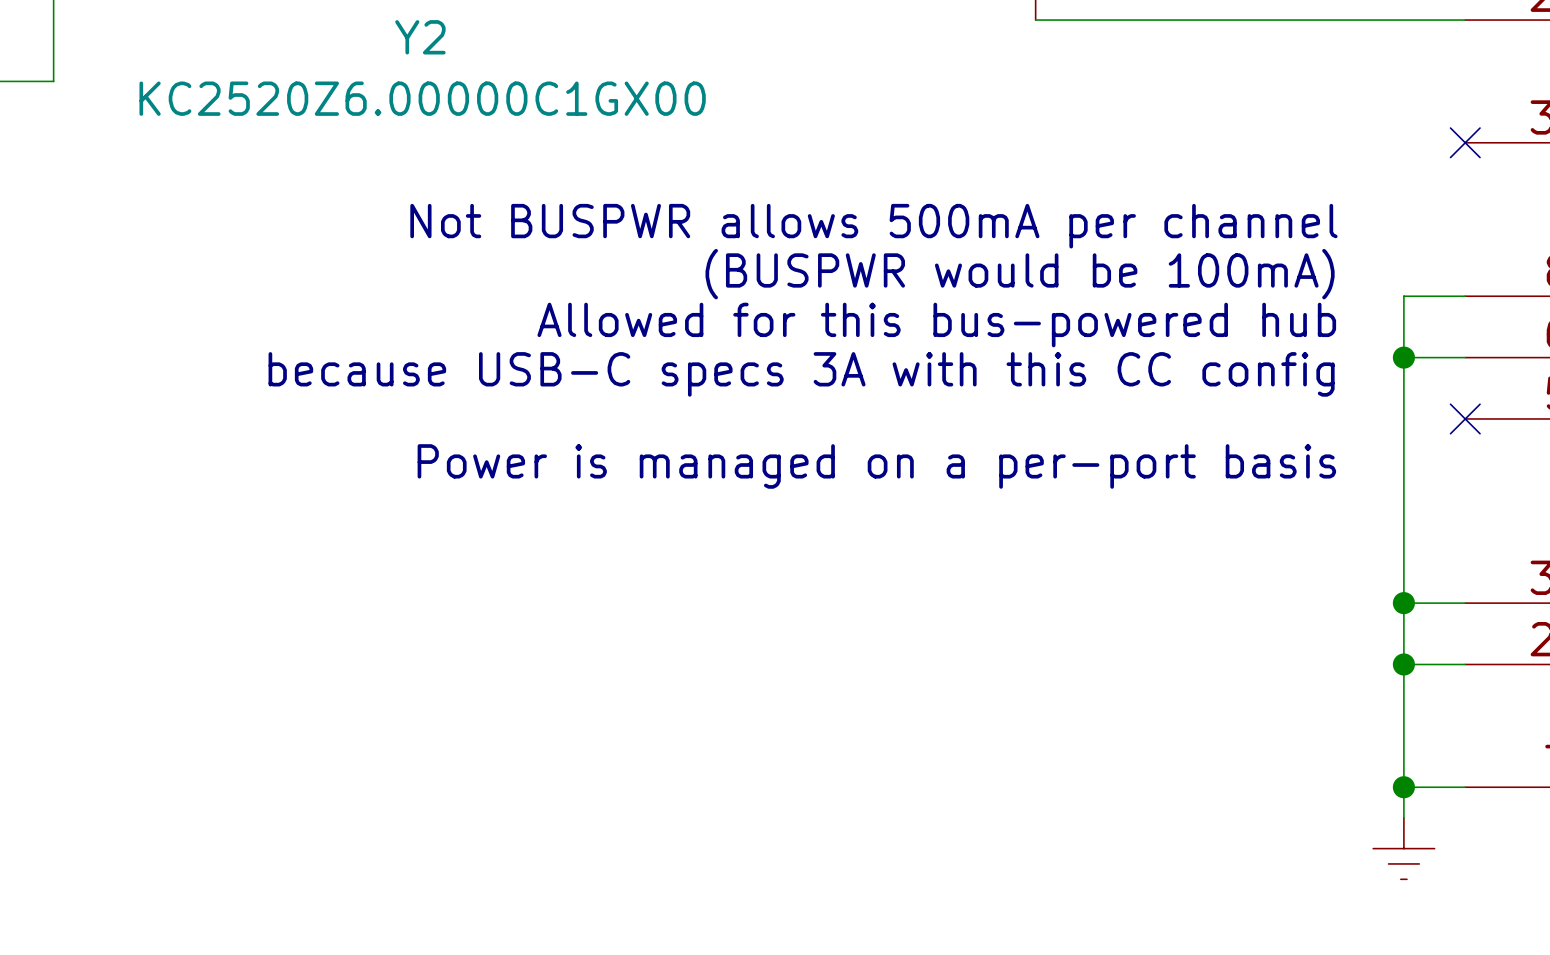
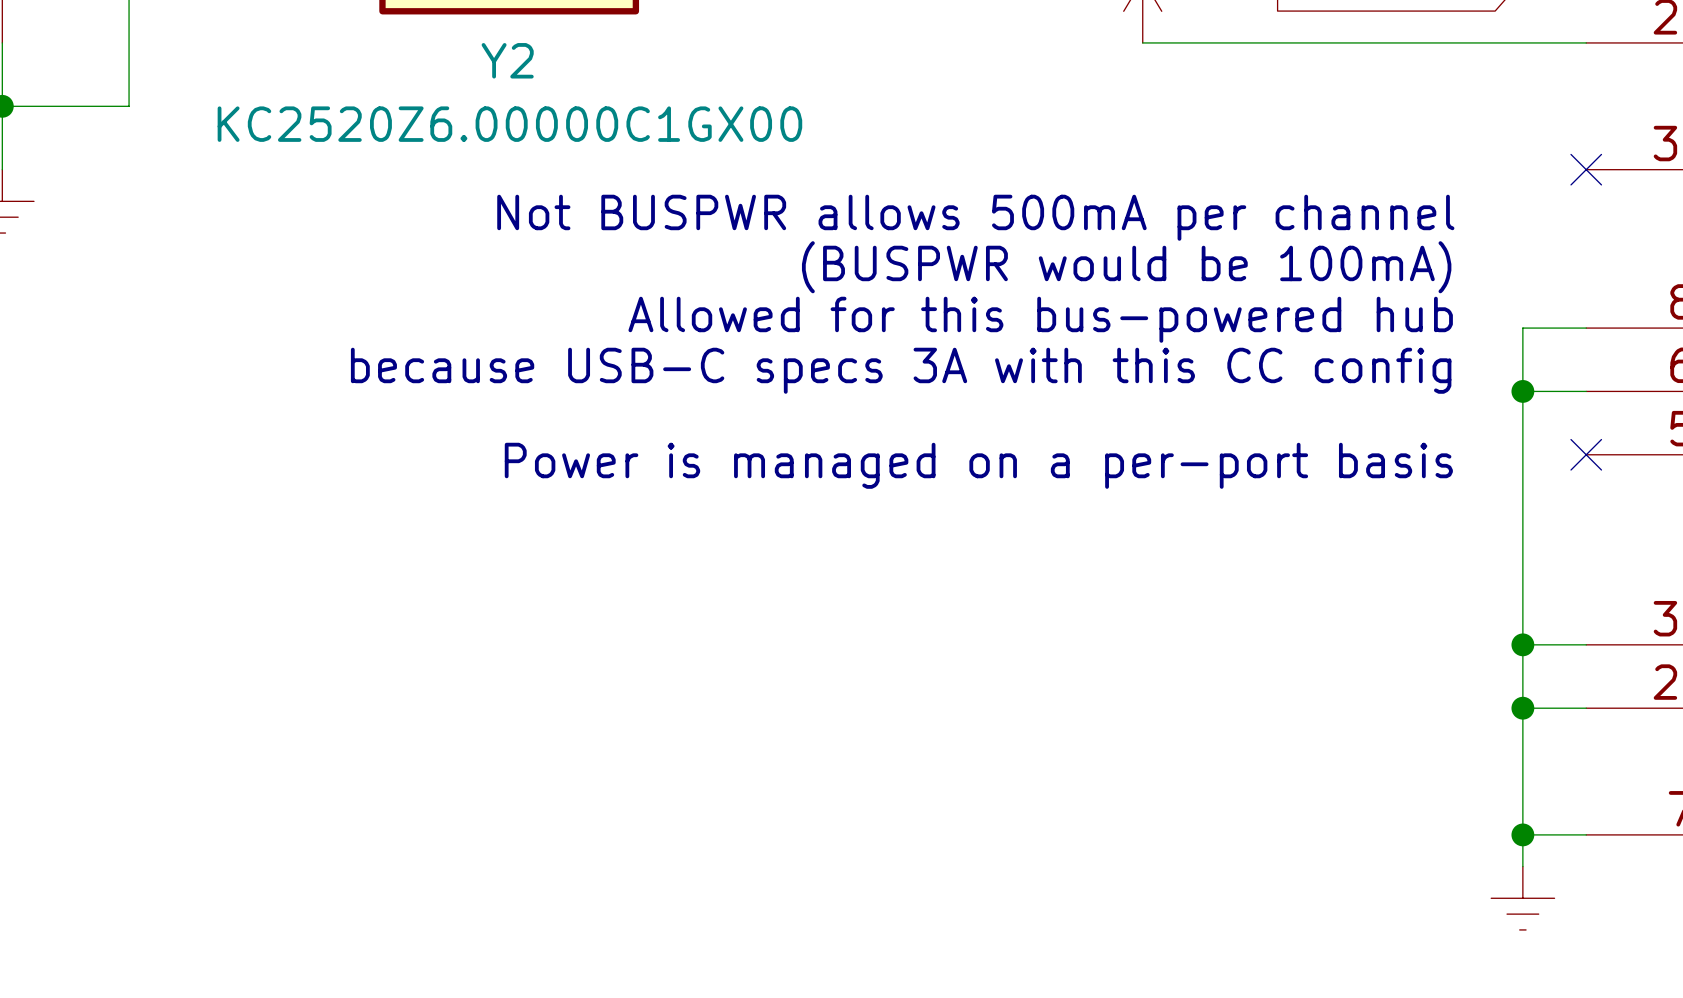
text position: Not BUSPWR allows 500mA per channel (873, 226) -> Not BUSPWR allows 500mA per channel (975, 217)
text position: (BUSPWR would be 100mA) (1020, 274) -> (BUSPWR would be 100mA) (1126, 267)
text position: Allowed for this bus-powered hub (936, 325) -> Allowed for this bus-powered hub (1040, 319)
text position: because USB-C specs 3A with this CC config (801, 374) -> because USB-C specs 3A with this CC config (901, 370)
text position: Power is managed on a per-port basis (876, 466) -> Power is managed on a per-port basis (978, 465)

